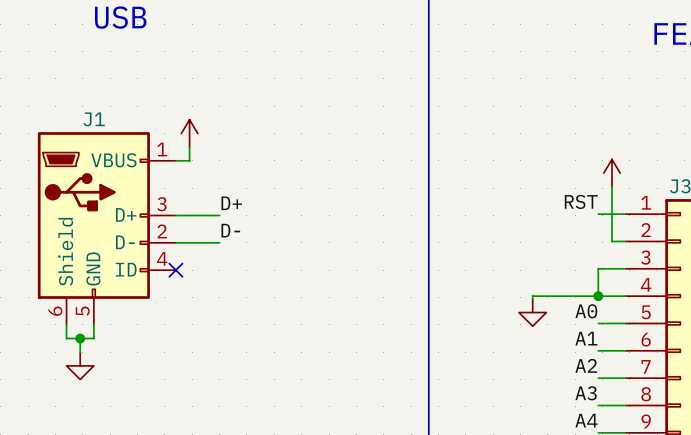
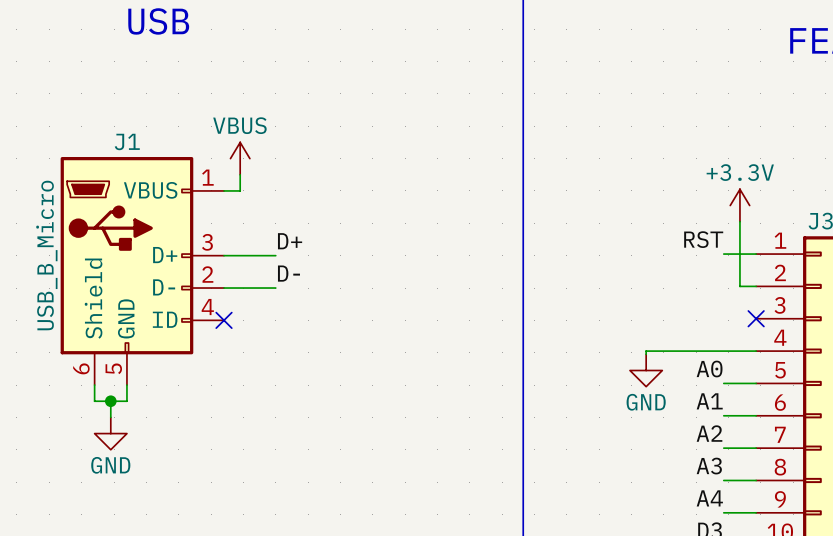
power symbol text: none -> VBUS (239, 125)
power symbol text: none -> +3.3V (740, 172)
J1 value: none -> USB_B_Micro (46, 255)
wire: (625, 268) (598, 268) (598, 296) -> none
no-connect mark: none -> (756, 318)
junction: (598, 296) -> none
power symbol text: none -> GND (646, 402)
power symbol text: none -> GND (110, 465)

